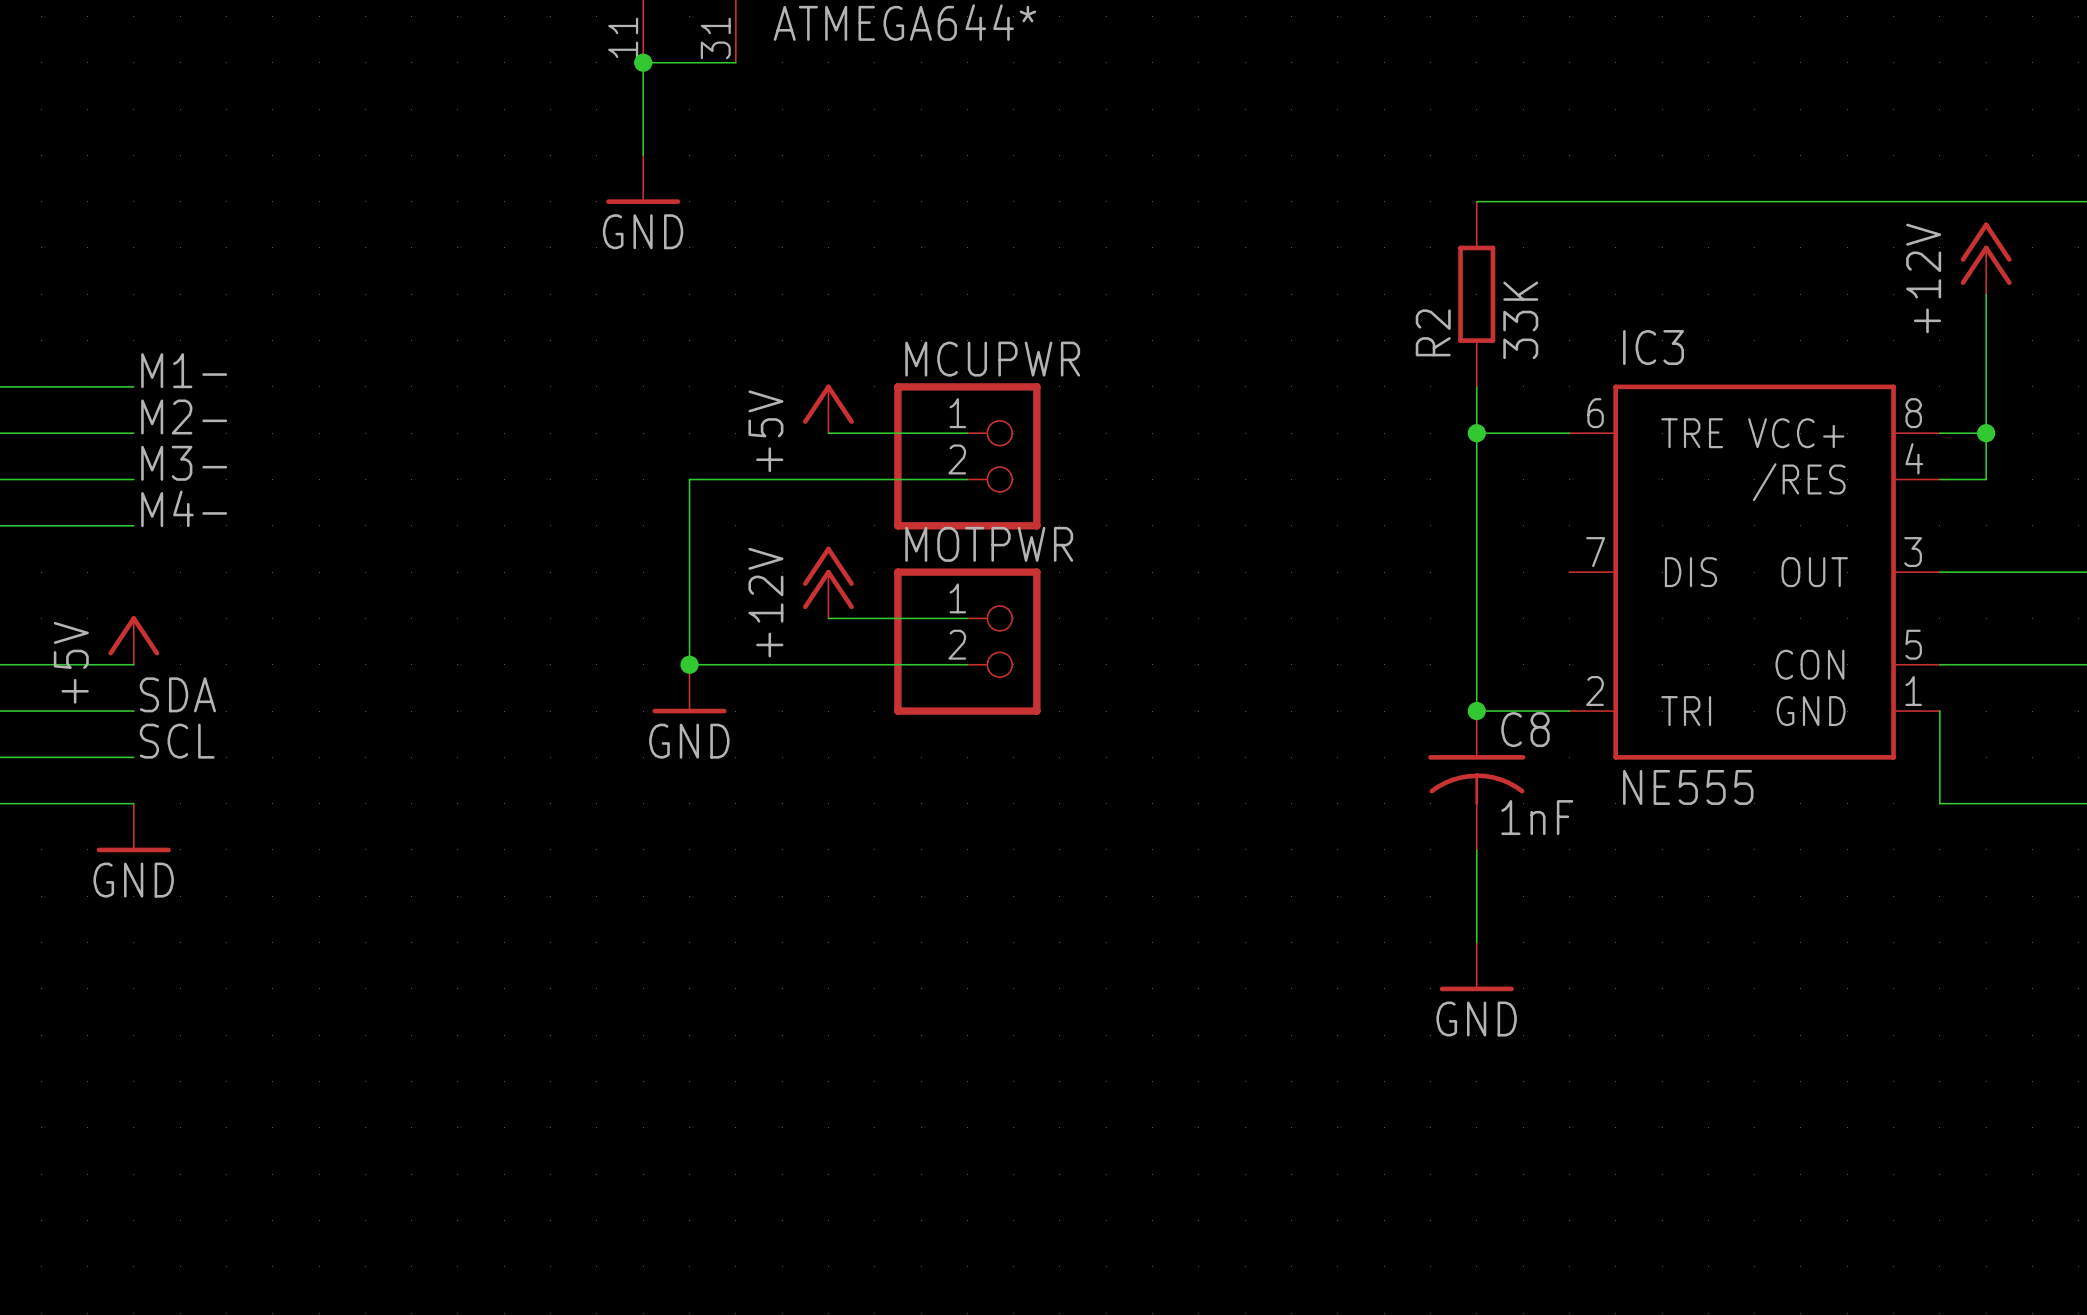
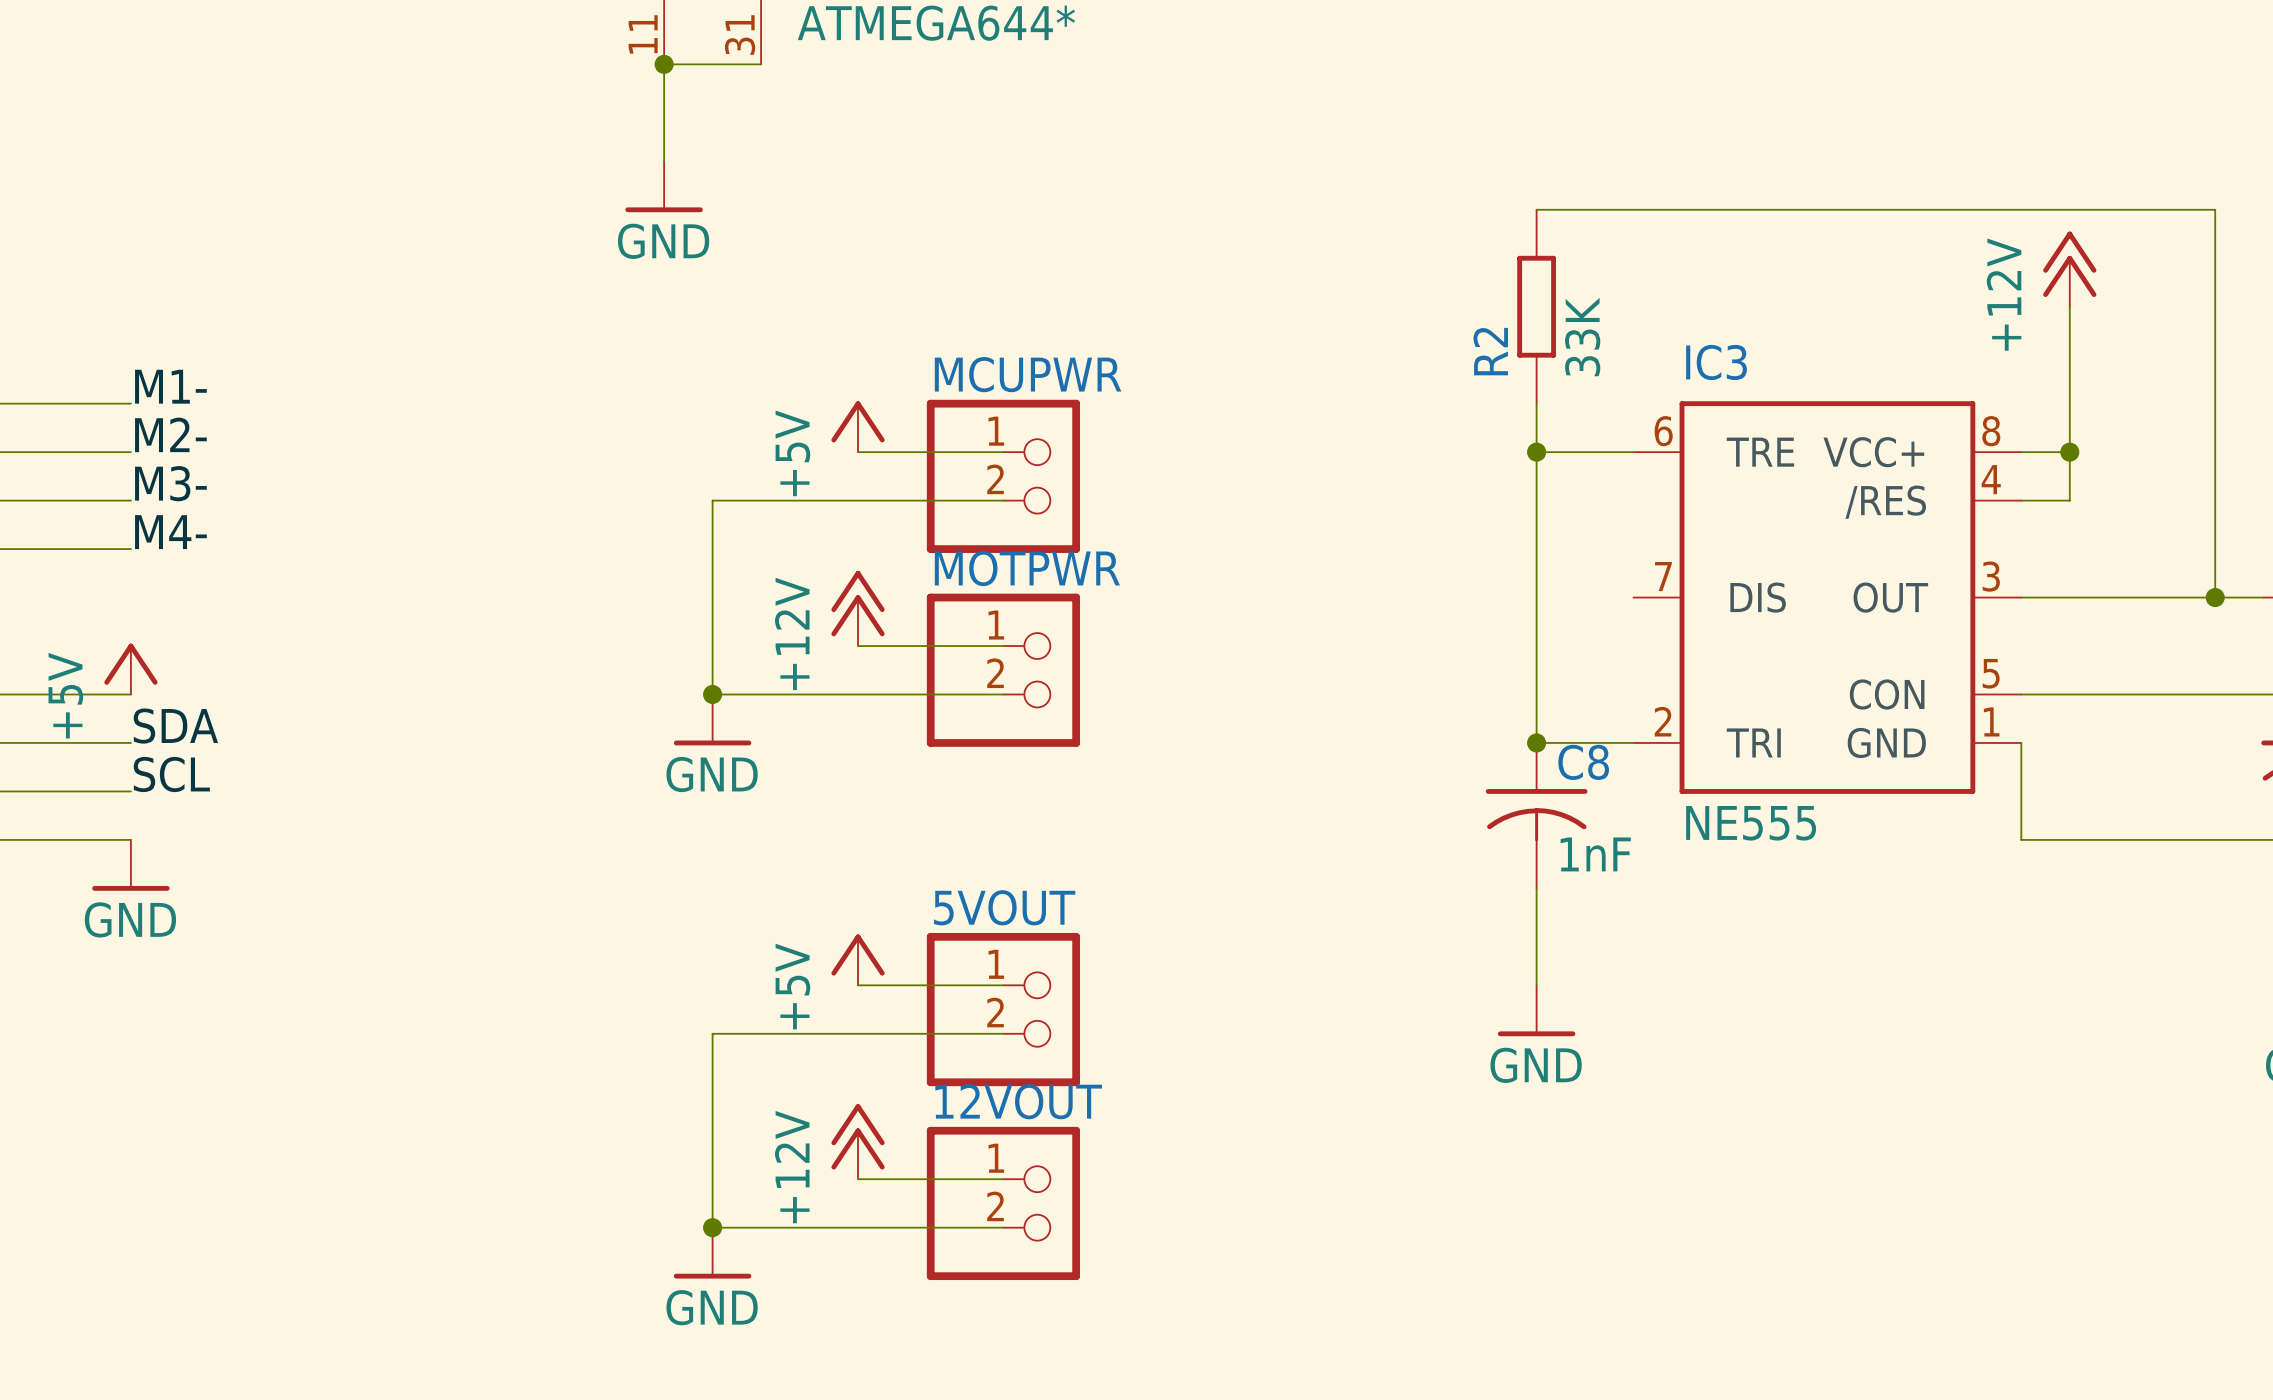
power symbol: none -> +5V (858, 959)
wire: none -> (858, 985) (1003, 985)
5VOUT: none -> (1003, 1009)
wire: none -> (1003, 1033) (712, 1033) (712, 1227) (1003, 1227)
power symbol: none -> +12V (858, 1141)
wire: none -> (858, 1179) (1003, 1179)
12VOUT: none -> (1003, 1203)
junction: none -> (712, 1227)
power symbol: none -> GND (712, 1253)

